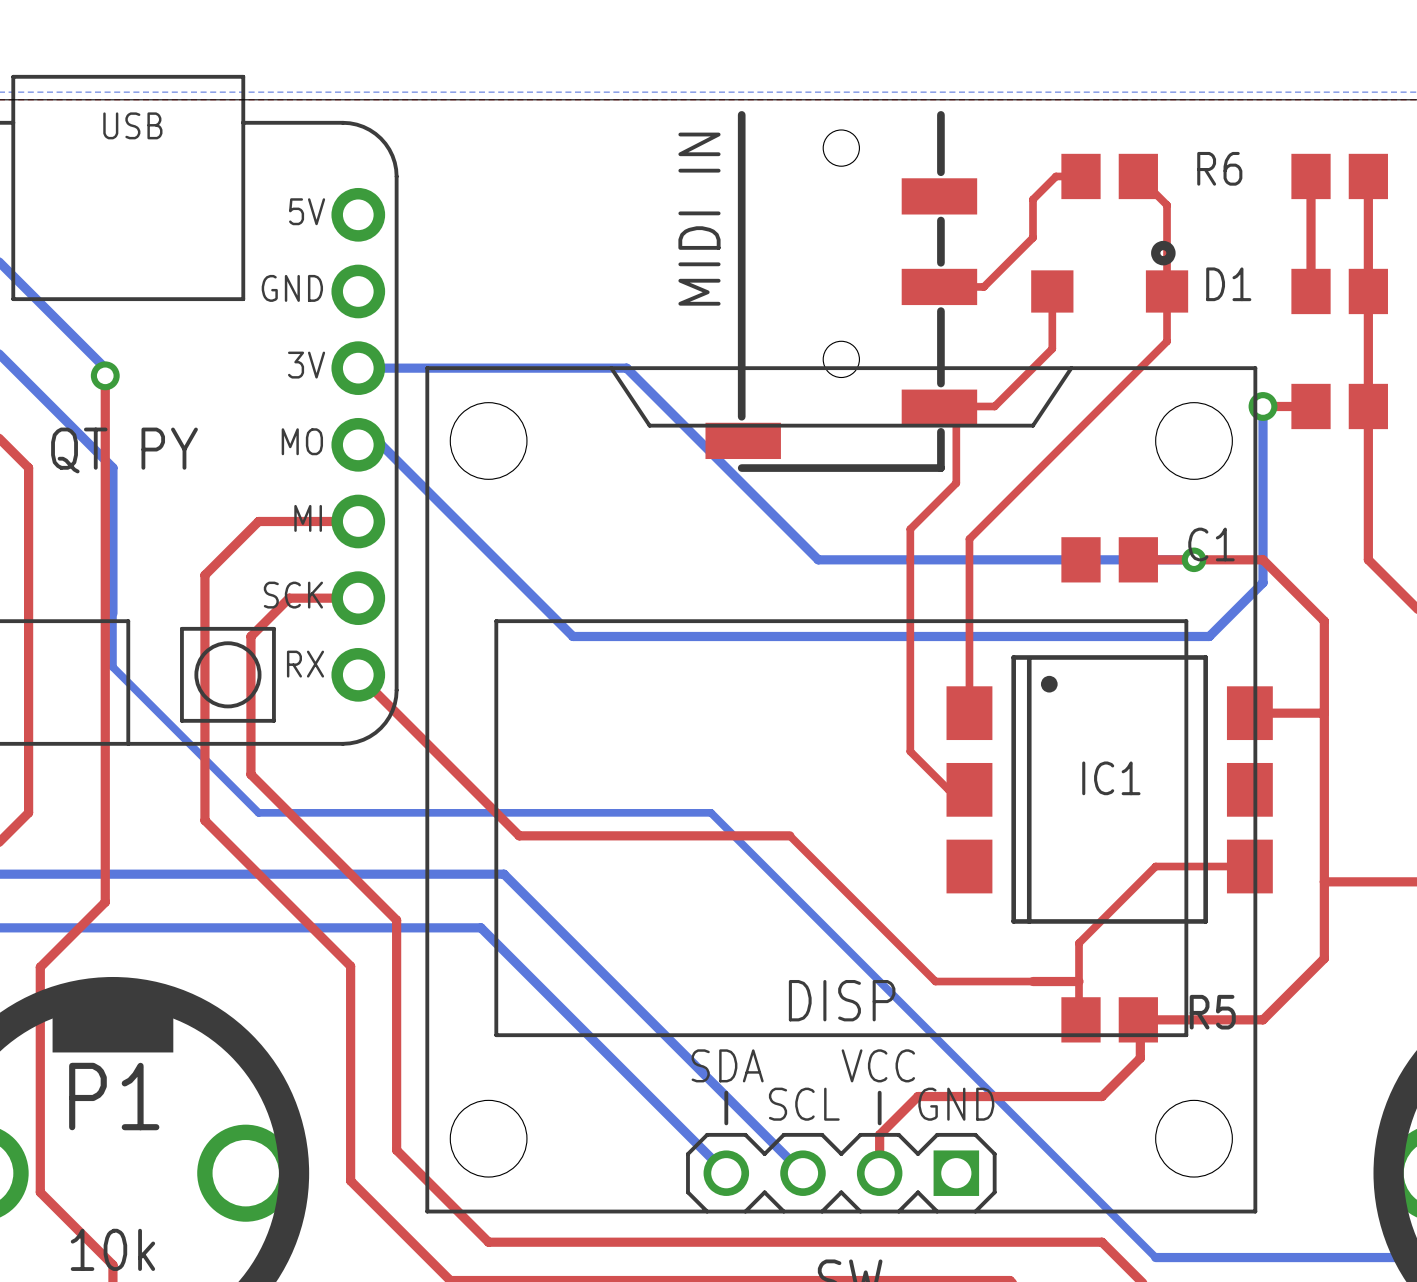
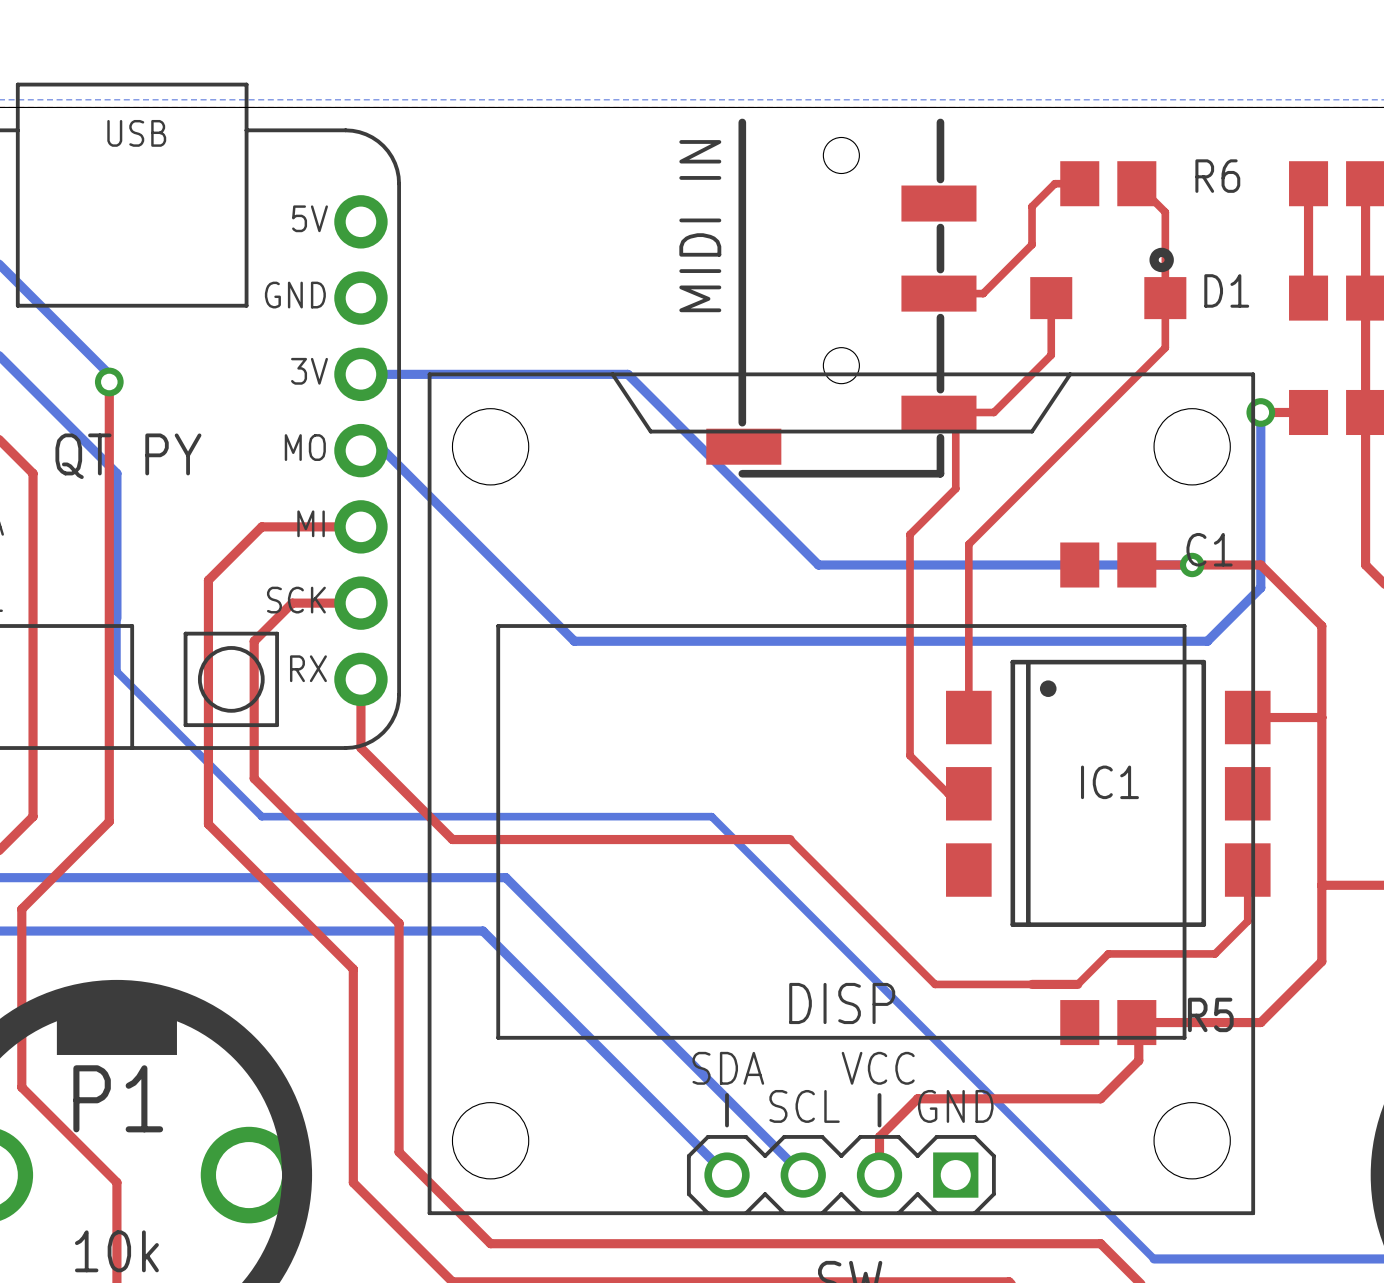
top track: (358, 674) (519, 835) -> (360, 679) (360, 748) (452, 839) (521, 839)
top track: (105, 817) (105, 902) (40, 967) (40, 1192) (112, 1265) -> (109, 821) (21, 909) (21, 1087) (116, 1182) (116, 1266)
top track: (1249, 866) (1155, 866) (1079, 943) (1079, 1019) (1080, 1019) -> (1247, 870) (1247, 921) (1215, 953) (1108, 953) (1079, 982)

